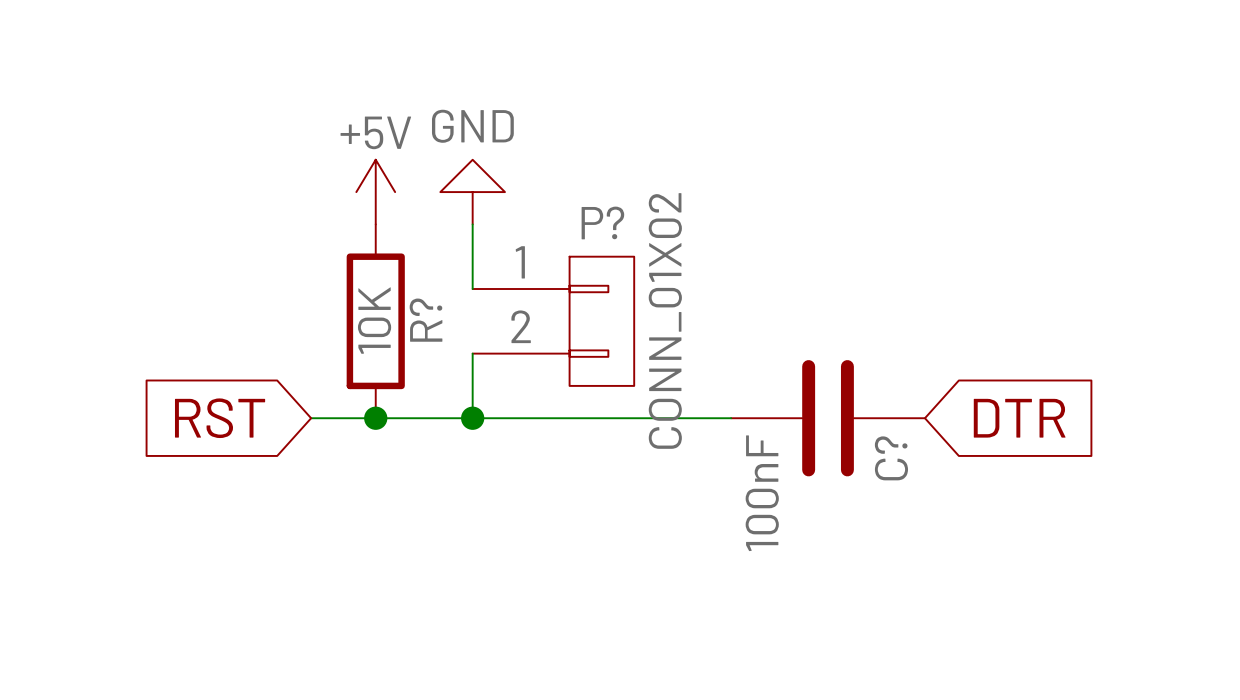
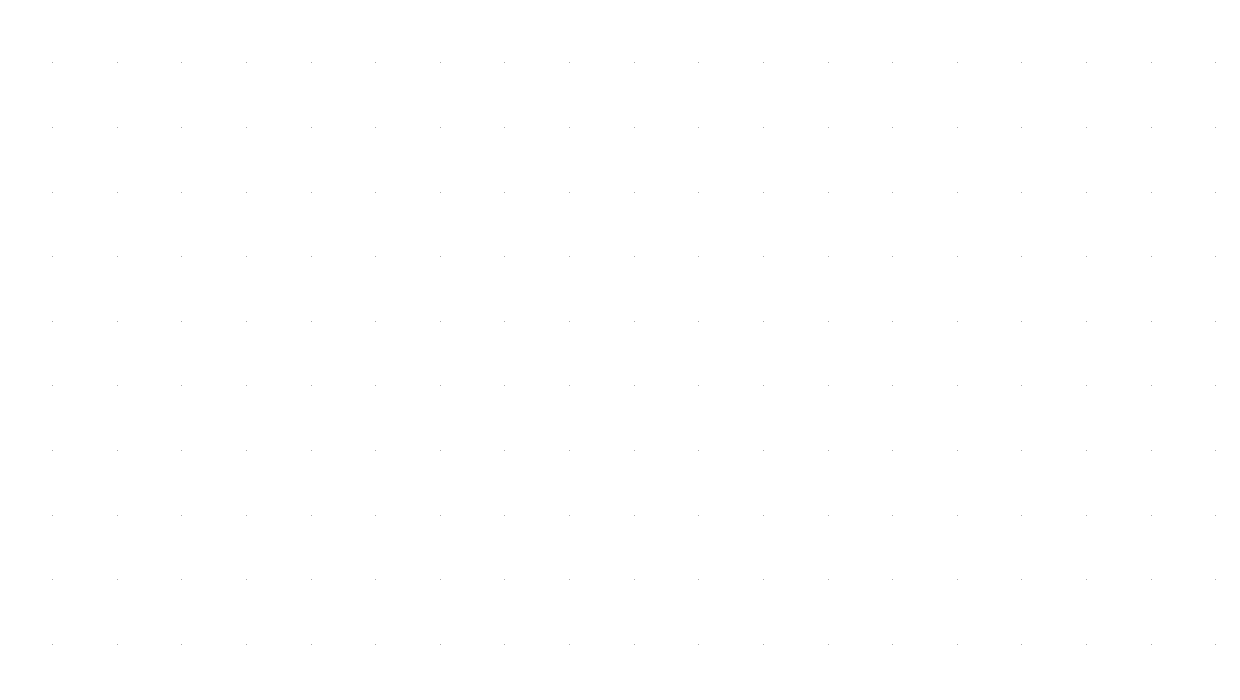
power symbol: +5V (375, 192) -> none
power symbol: GND (472, 192) -> none
wire: (472, 224) (472, 289) -> none
R?: 10K (375, 321) -> none
P?: CONN_01X02 (553, 321) -> none
wire: (472, 353) (472, 418) -> none
global label: RST (220, 418) -> none
wire: (311, 418) (731, 418) -> none
junction: (375, 418) -> none
junction: (472, 418) -> none
C?: 100nF (828, 418) -> none
global label: DTR (1019, 418) -> none

